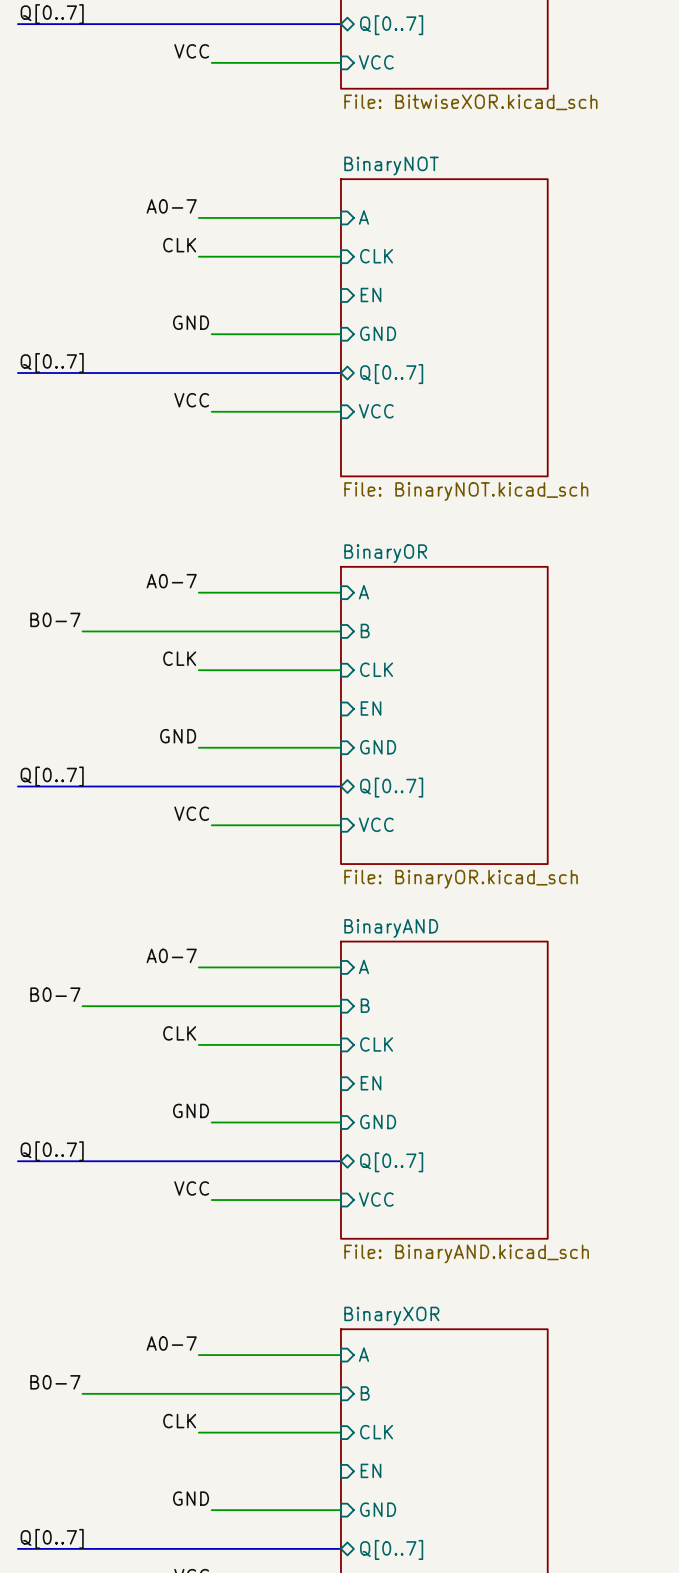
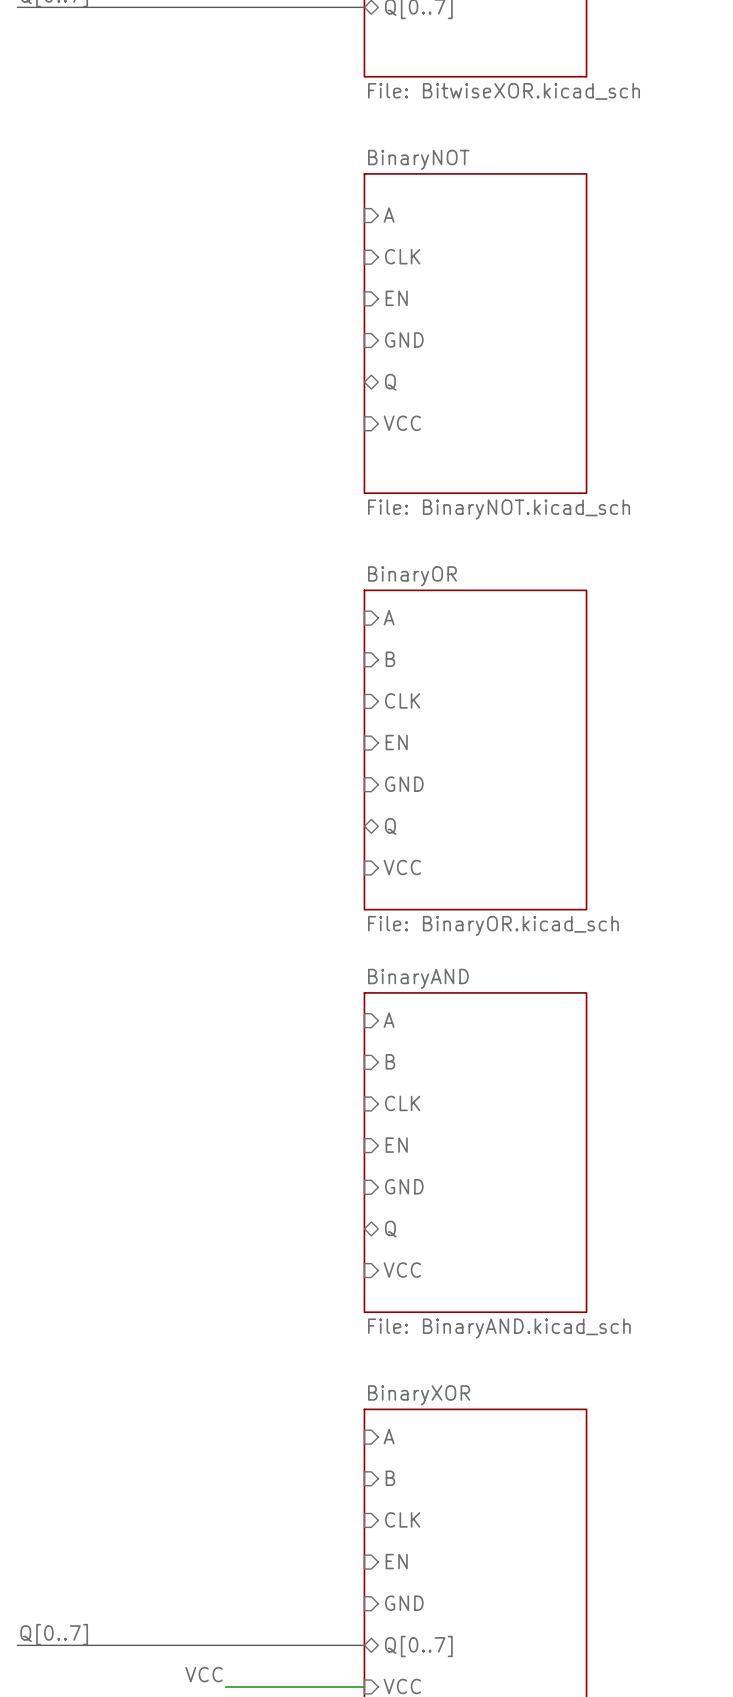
label: VCC (191, 51) -> none
wire: (211, 62) (340, 62) -> none
sheet pin: VCC (376, 62) -> none
label: A0-7 (171, 206) -> none
wire: (198, 217) (340, 217) -> none
label: CLK (179, 245) -> none
wire: (198, 256) (340, 256) -> none
label: GND (191, 322) -> none
wire: (211, 334) (340, 334) -> none
label: Q[0..7] (52, 363) -> none
bus: (17, 373) (340, 373) -> none
sheet pin: Q[0..7] (391, 374) -> Q (390, 382)
label: VCC (191, 400) -> none
wire: (211, 411) (340, 411) -> none
label: A0-7 (171, 581) -> none
wire: (198, 592) (340, 592) -> none
label: B0-7 (55, 619) -> none
wire: (82, 631) (340, 631) -> none
label: CLK (179, 658) -> none
wire: (198, 670) (340, 670) -> none
label: GND (178, 736) -> none
wire: (198, 747) (340, 747) -> none
label: Q[0..7] (52, 776) -> none
bus: (17, 786) (340, 786) -> none
sheet pin: Q[0..7] (391, 787) -> Q (390, 826)
label: VCC (191, 813) -> none
wire: (211, 825) (340, 825) -> none
label: A0-7 (171, 955) -> none
wire: (198, 967) (340, 967) -> none
label: B0-7 (55, 994) -> none
wire: (82, 1006) (340, 1006) -> none
label: CLK (179, 1033) -> none
wire: (198, 1044) (340, 1044) -> none
label: GND (191, 1110) -> none
wire: (211, 1122) (340, 1122) -> none
label: Q[0..7] (52, 1151) -> none
bus: (17, 1161) (340, 1161) -> none
sheet pin: Q[0..7] (391, 1162) -> Q (390, 1229)
label: VCC (191, 1188) -> none
wire: (211, 1200) (340, 1200) -> none
label: A0-7 (171, 1343) -> none
wire: (198, 1355) (340, 1355) -> none
label: B0-7 (55, 1382) -> none
wire: (82, 1393) (340, 1393) -> none
label: CLK (179, 1421) -> none
wire: (198, 1432) (340, 1432) -> none
label: GND (191, 1498) -> none
wire: (211, 1510) (340, 1510) -> none

